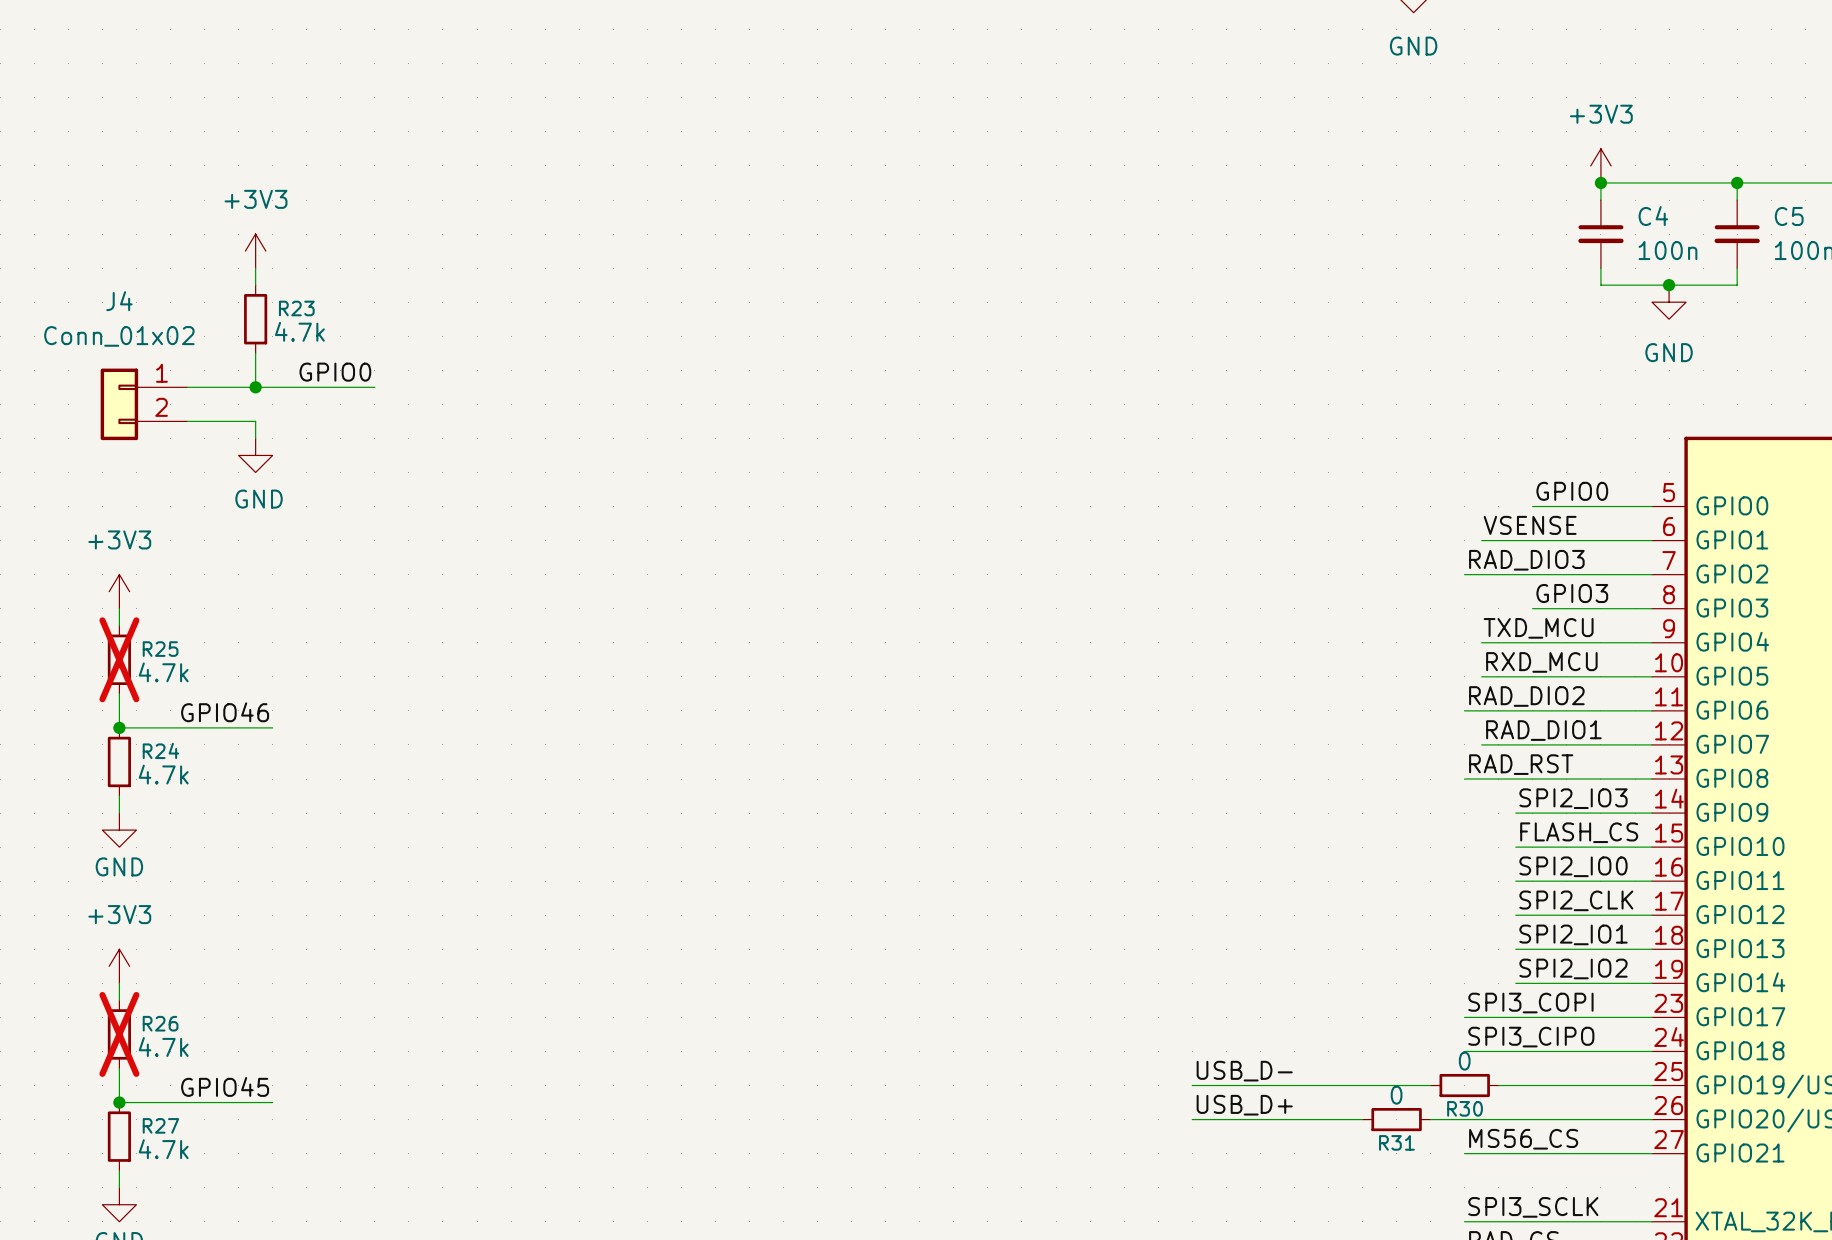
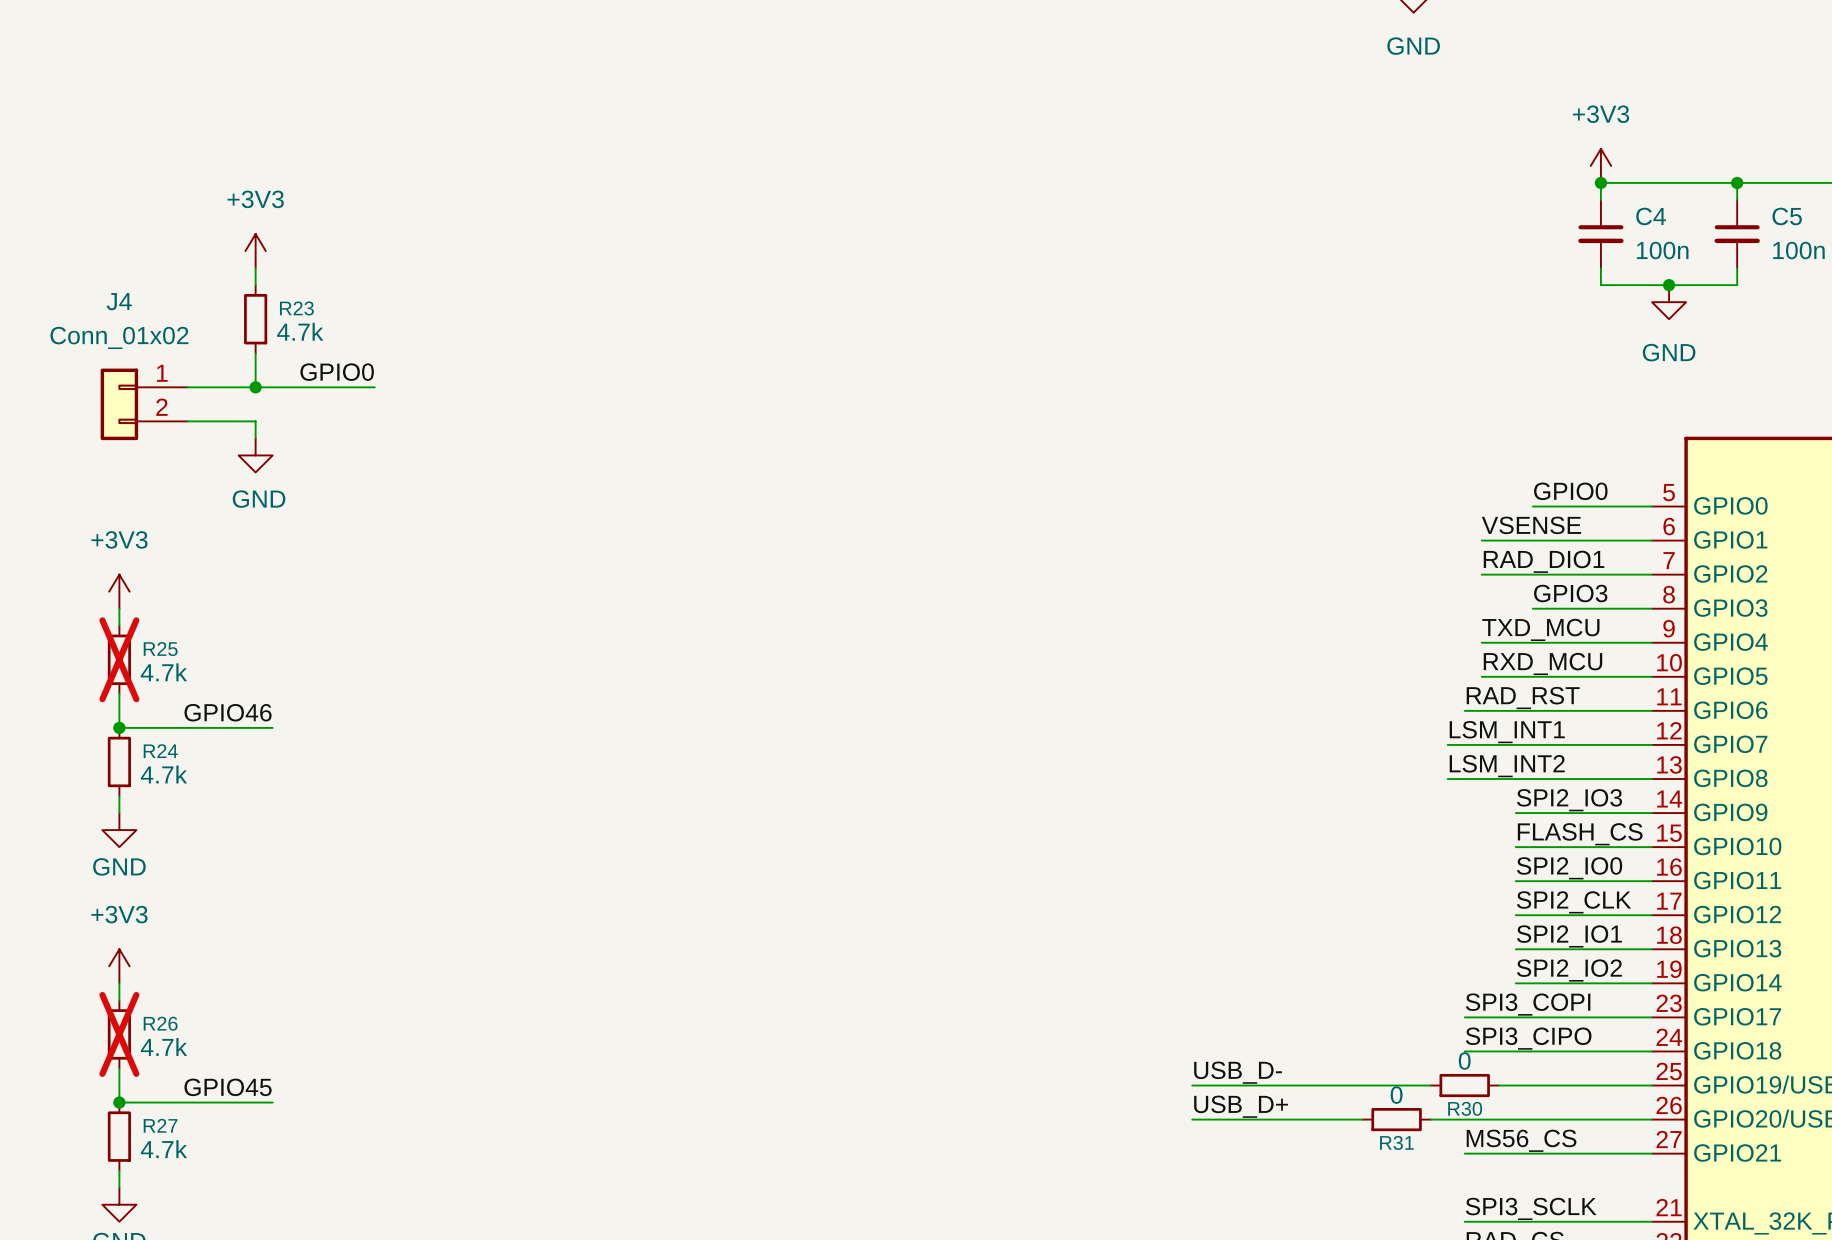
label: RAD_DIO3 (1526, 560) -> none
wire: (1464, 574) (1481, 574) -> (1447, 779) (1464, 779)
label: RAD_DIO2 (1526, 696) -> RAD_RST (1523, 698)
label: none -> LSM_INT1 (1507, 732)
label position: RAD_DIO1 (1543, 730) -> RAD_DIO1 (1544, 561)
wire: none -> (1447, 744) (1481, 744)
label: none -> LSM_INT2 (1507, 766)
label: RAD_RST (1521, 764) -> none

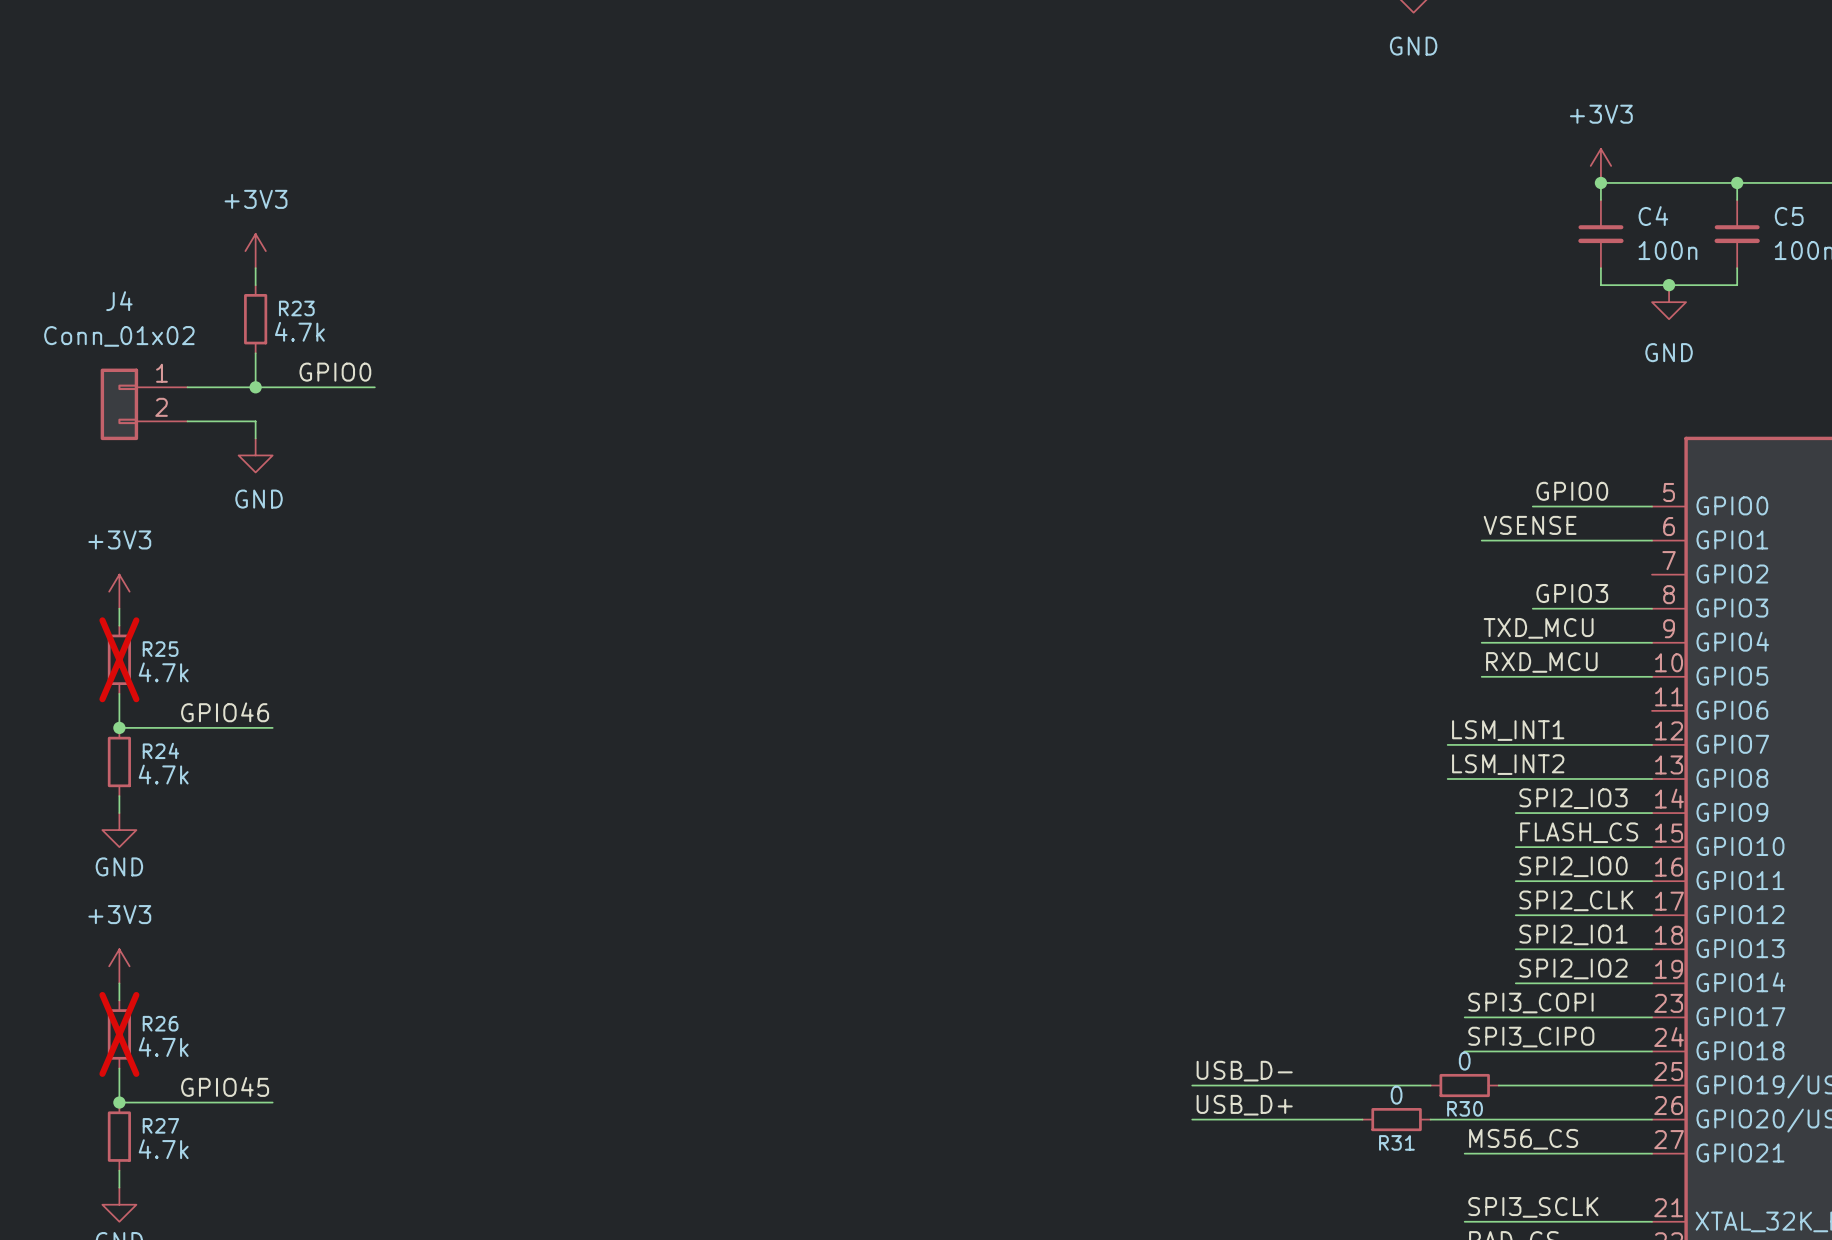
label: RAD_DIO1 (1544, 561) -> none
wire: (1481, 574) (1652, 574) -> none
label: RAD_RST (1523, 698) -> none
wire: (1464, 710) (1652, 710) -> none

